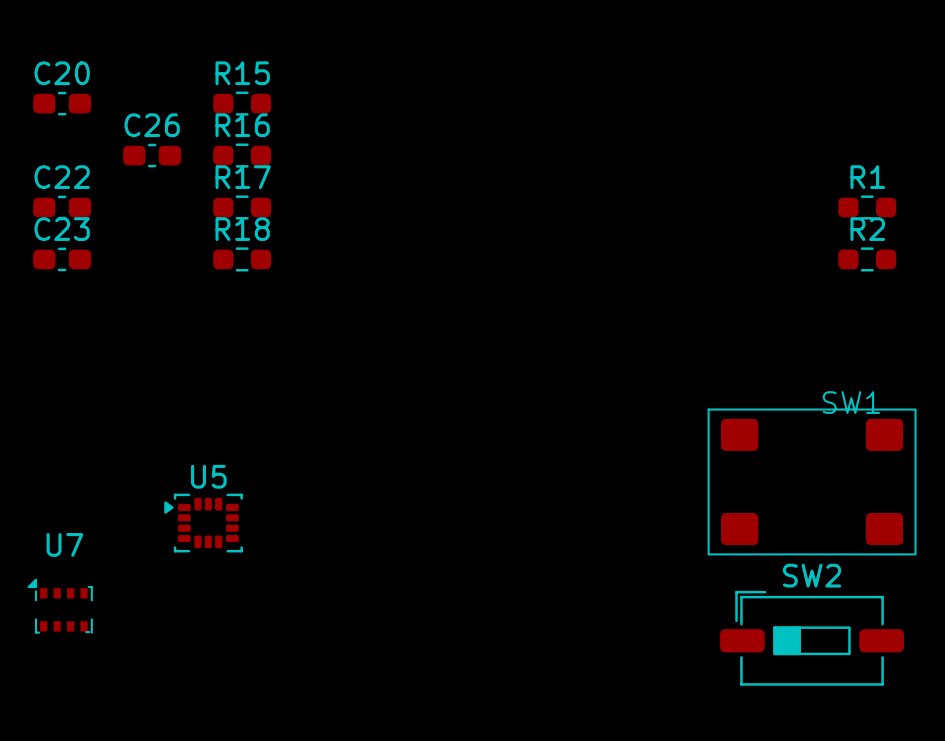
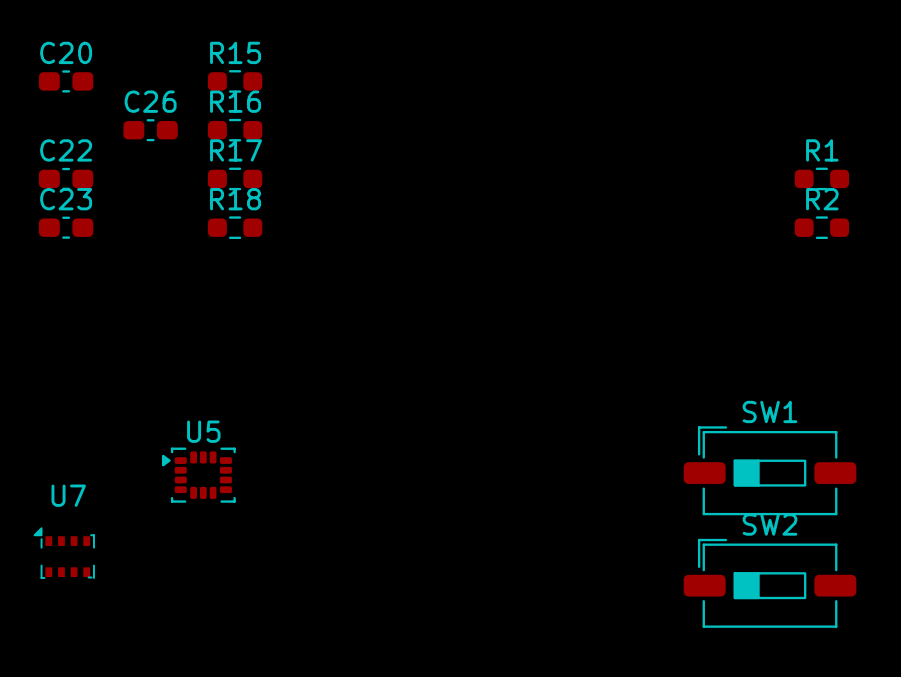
SW1 name position: SW1 (851, 402) -> SW1 (770, 411)
SW1 footprint: [707, 408, 917, 556] -> [683, 426, 857, 516]

